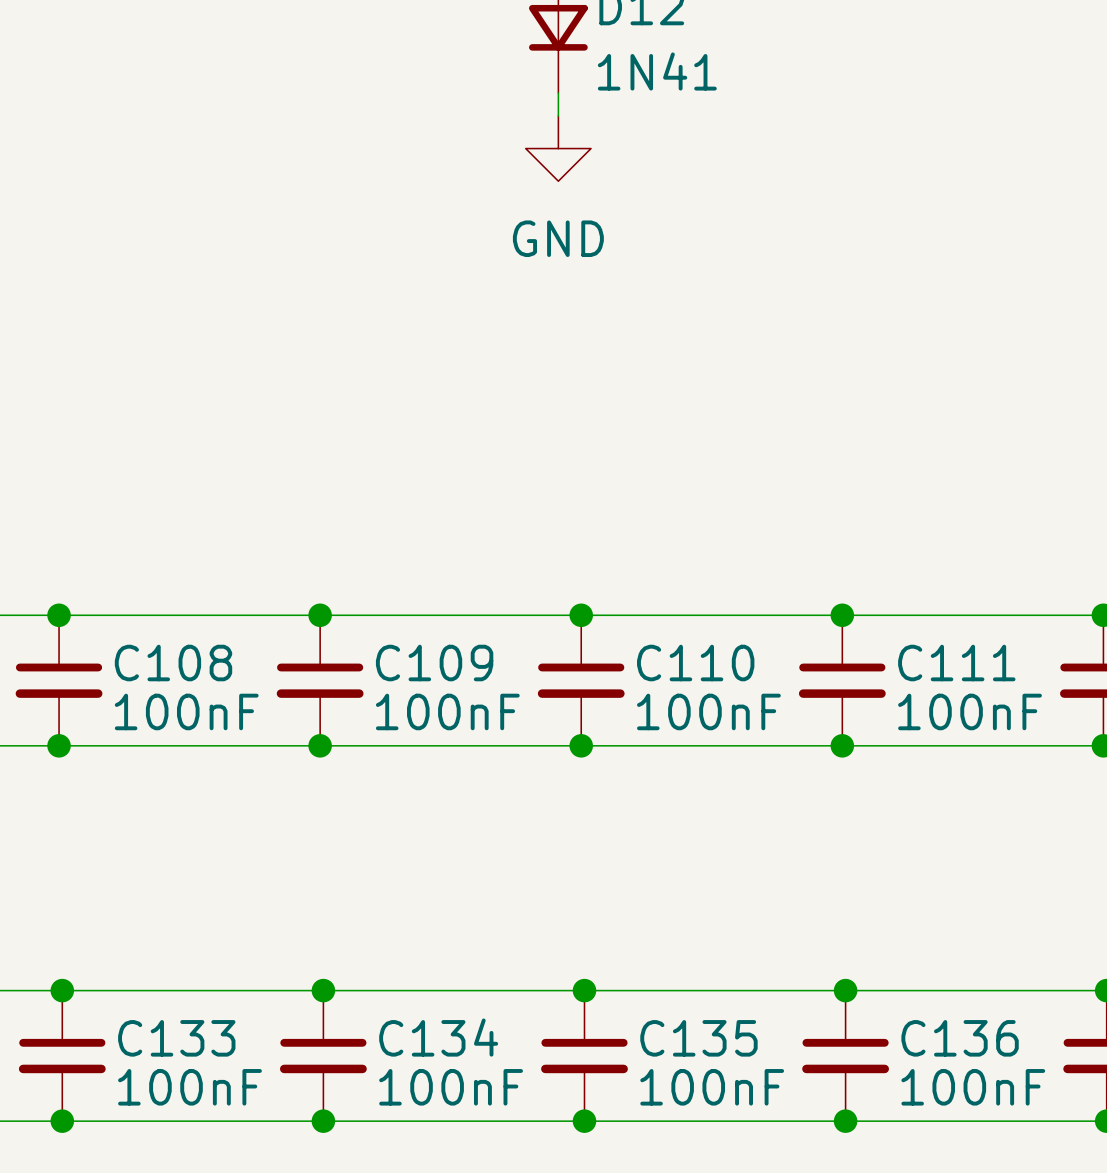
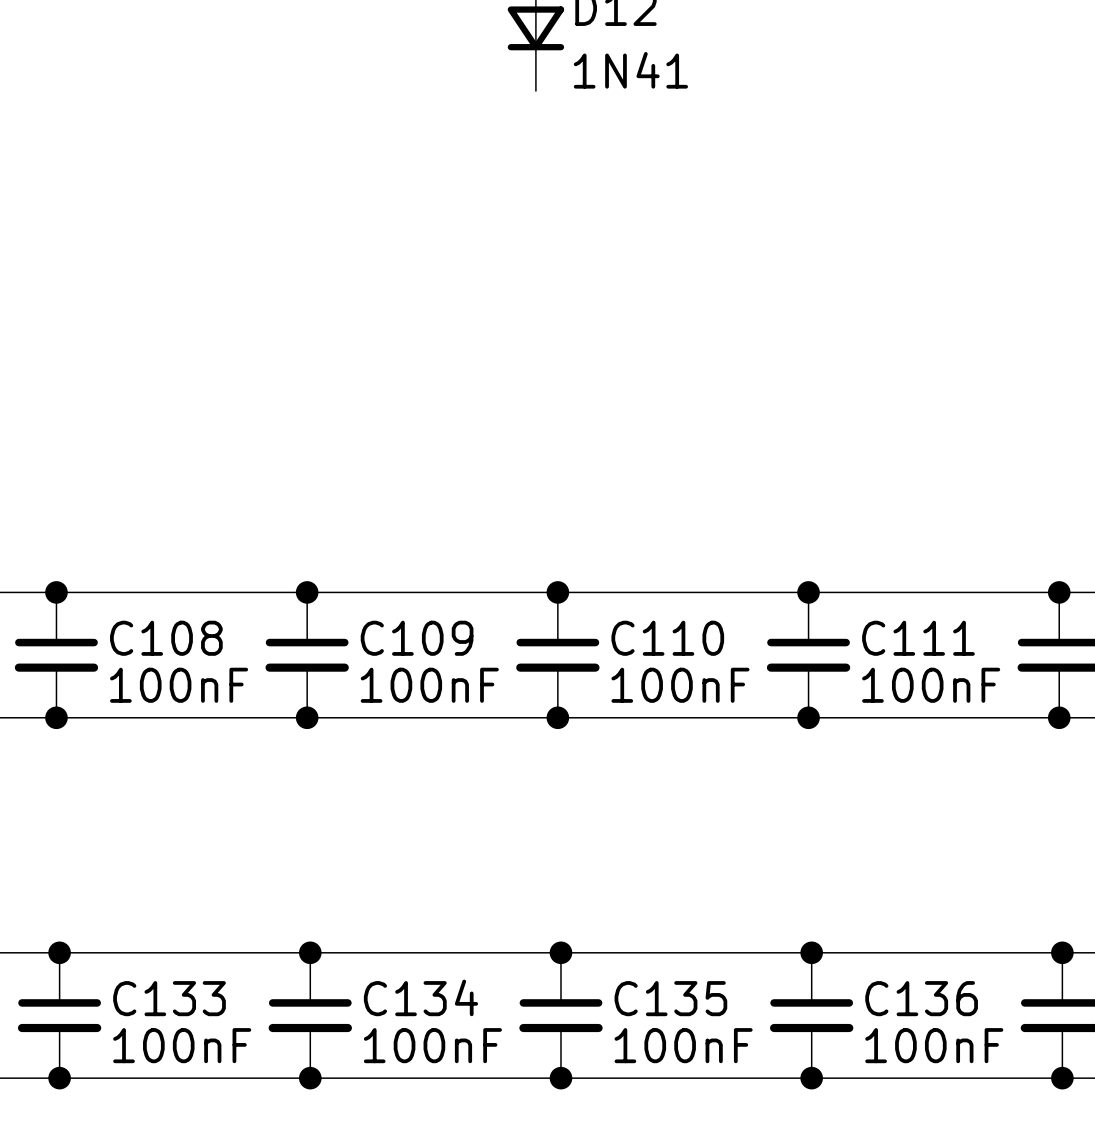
wire: (558, 93) (558, 115) -> none
power symbol: GND (558, 148) -> none

